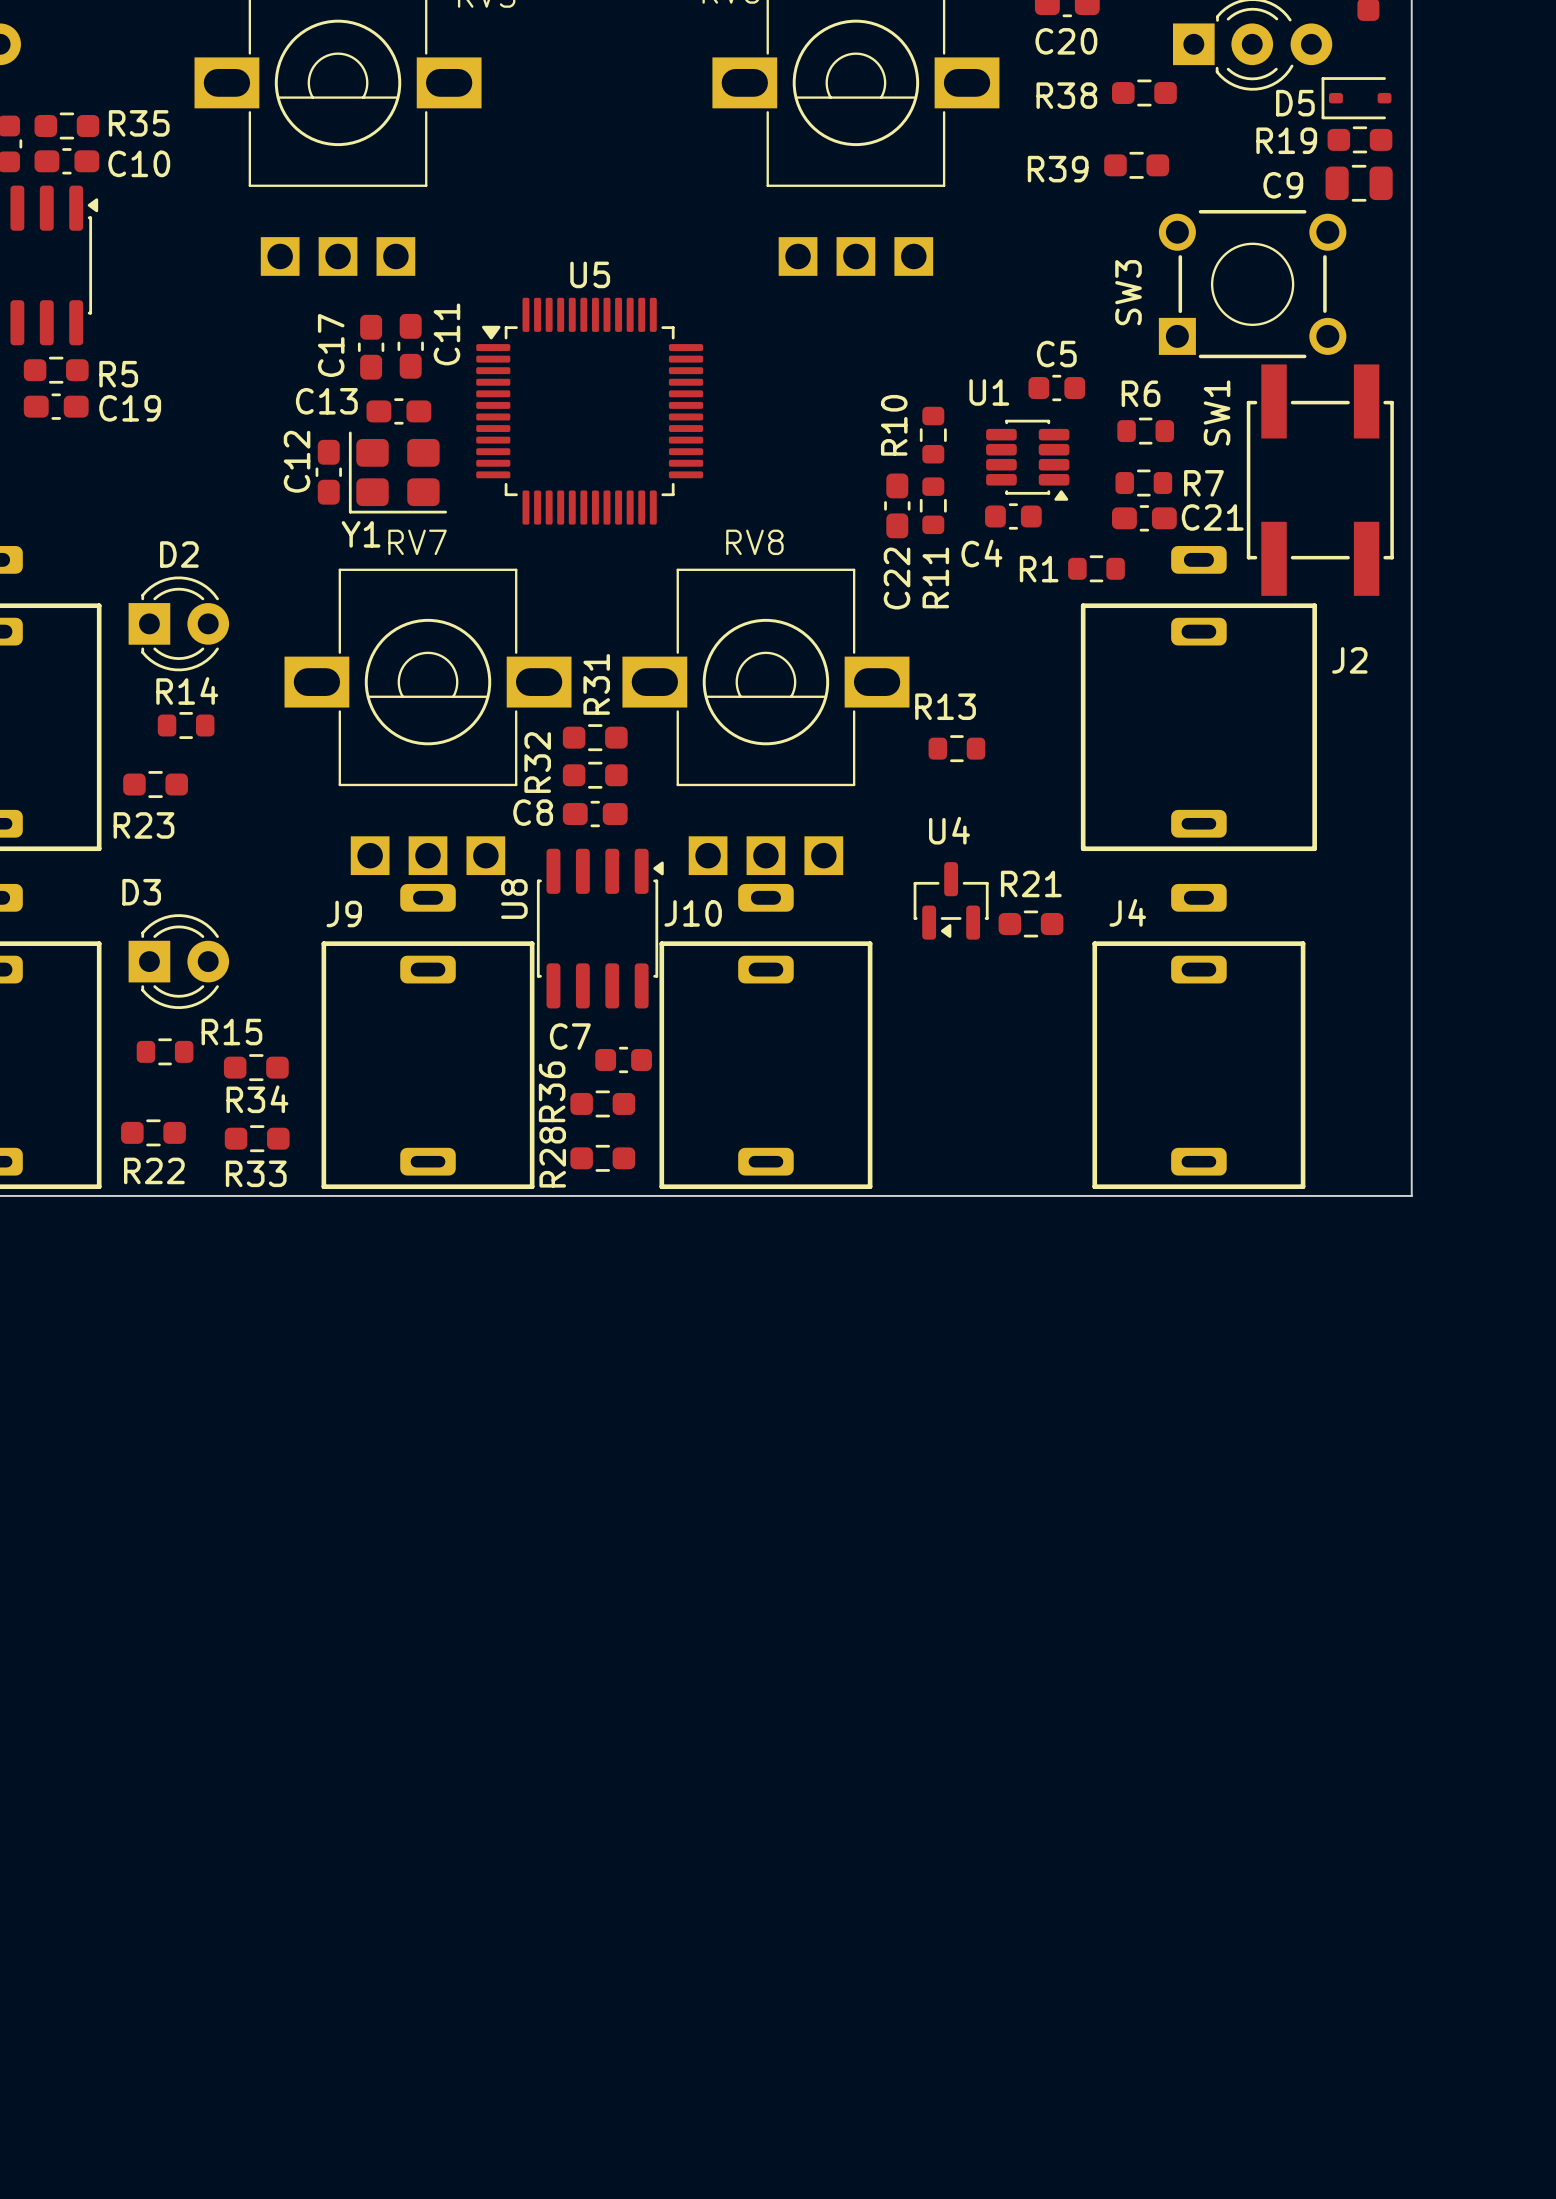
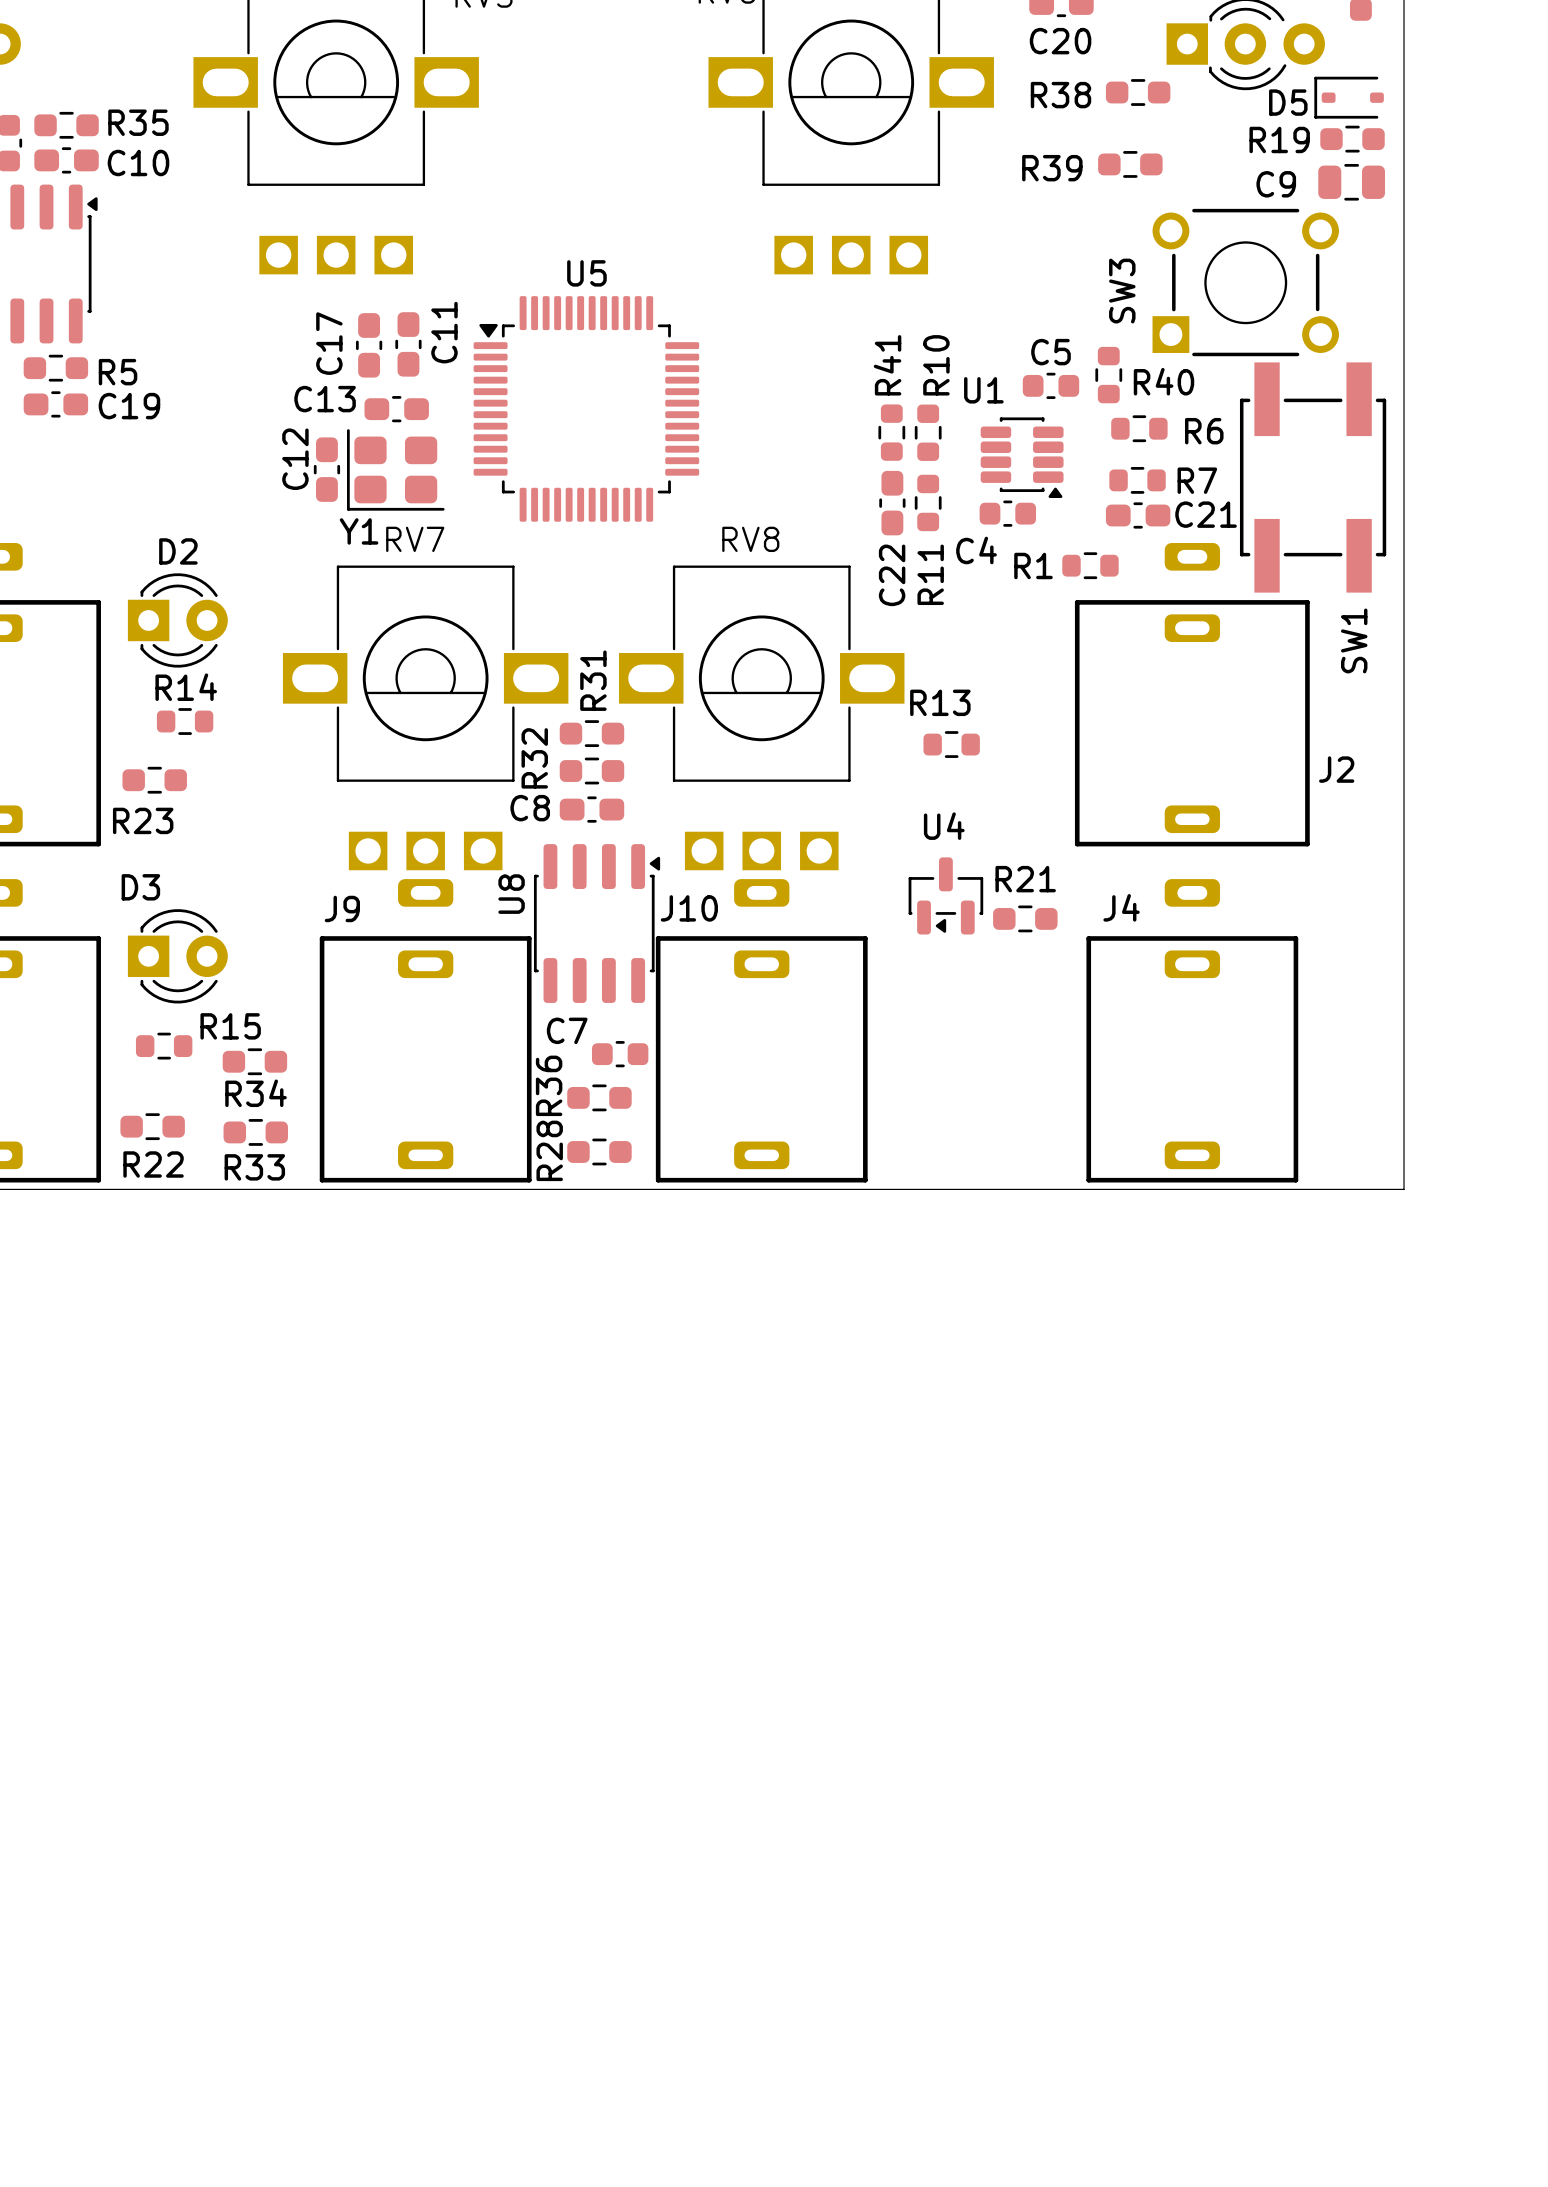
R40: none -> (1108, 375)
R6 name position: R6 (1141, 393) -> R6 (1204, 431)
SW1 name position: SW1 (1217, 413) -> SW1 (1354, 640)
R10 name position: R10 (894, 425) -> R10 (936, 365)
R41: none -> (891, 432)
J2 name position: J2 (1349, 660) -> J2 (1336, 769)

